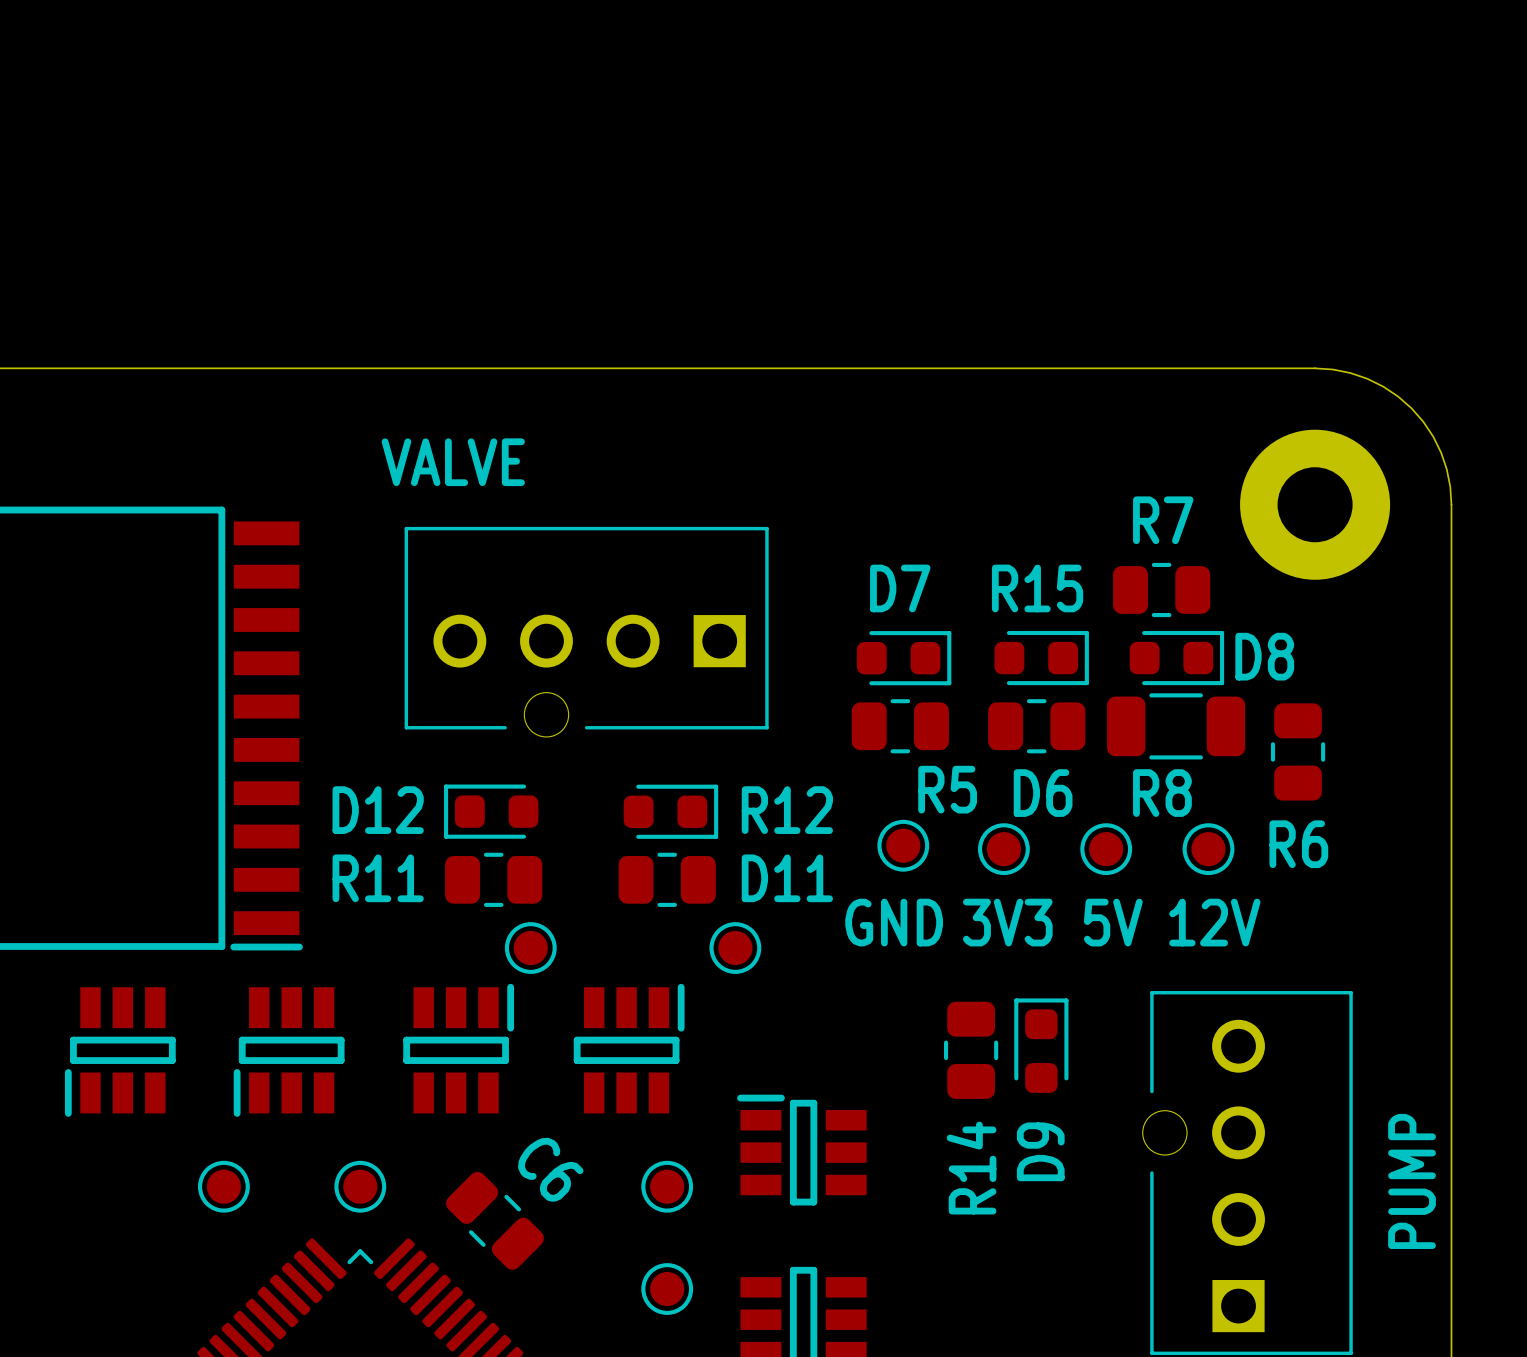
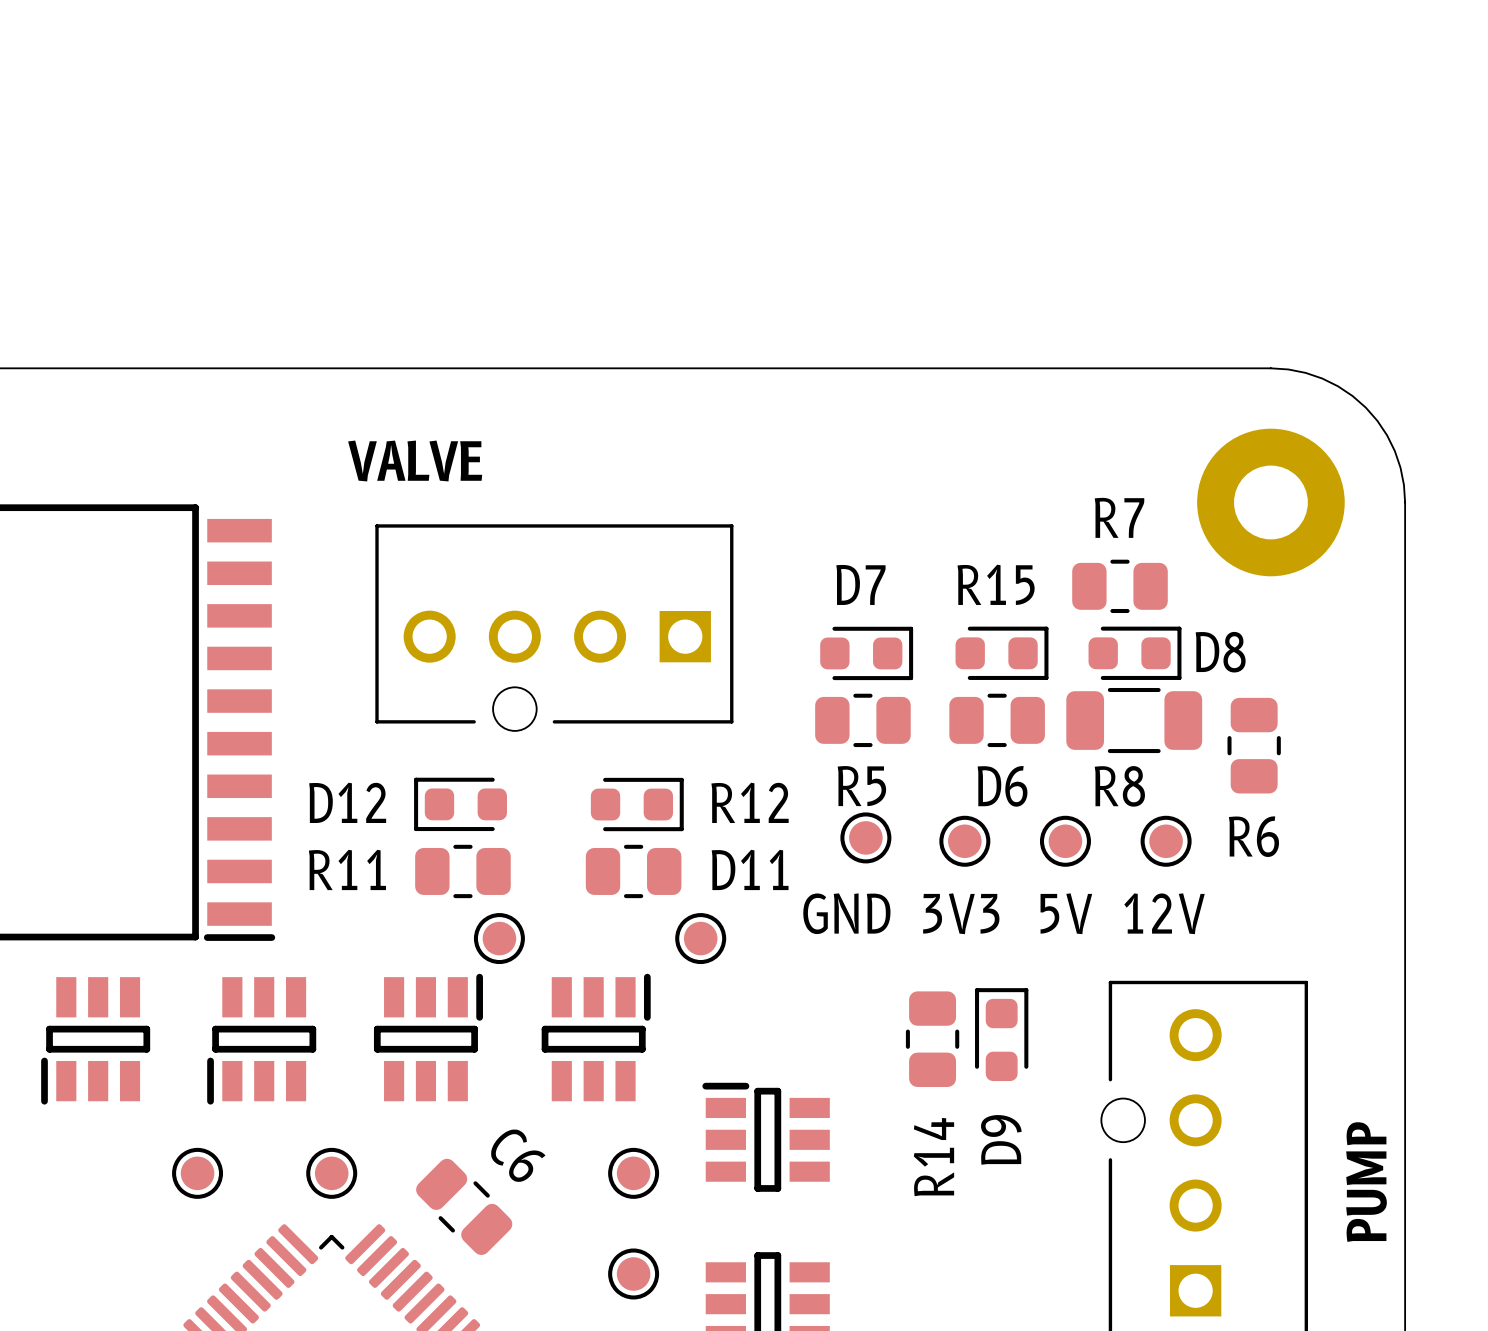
R5 name position: R5 (947, 789) -> R5 (861, 786)

